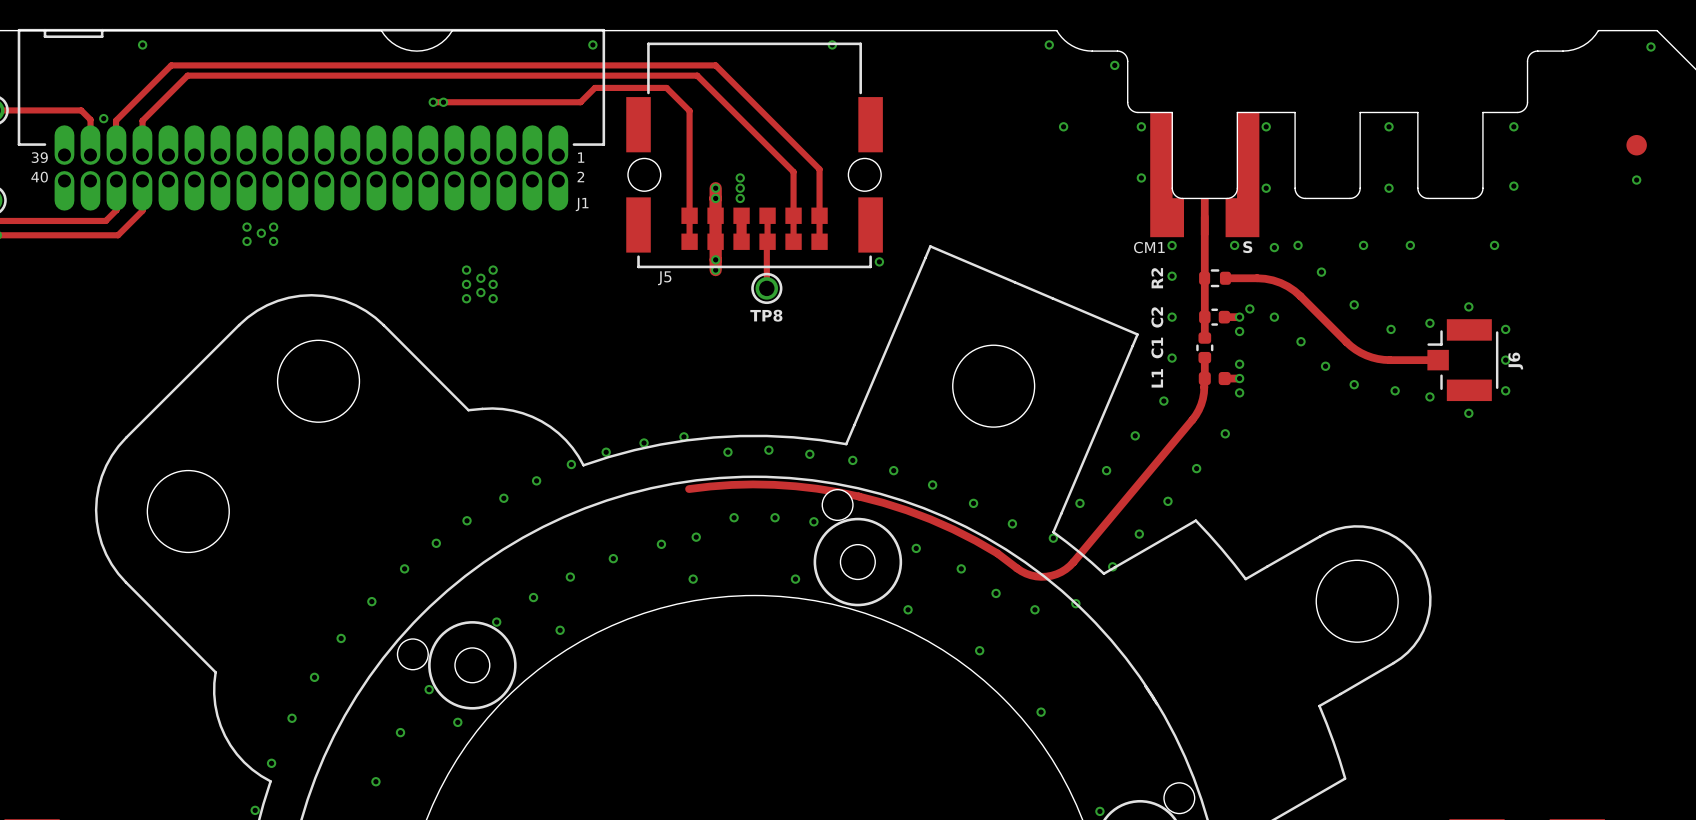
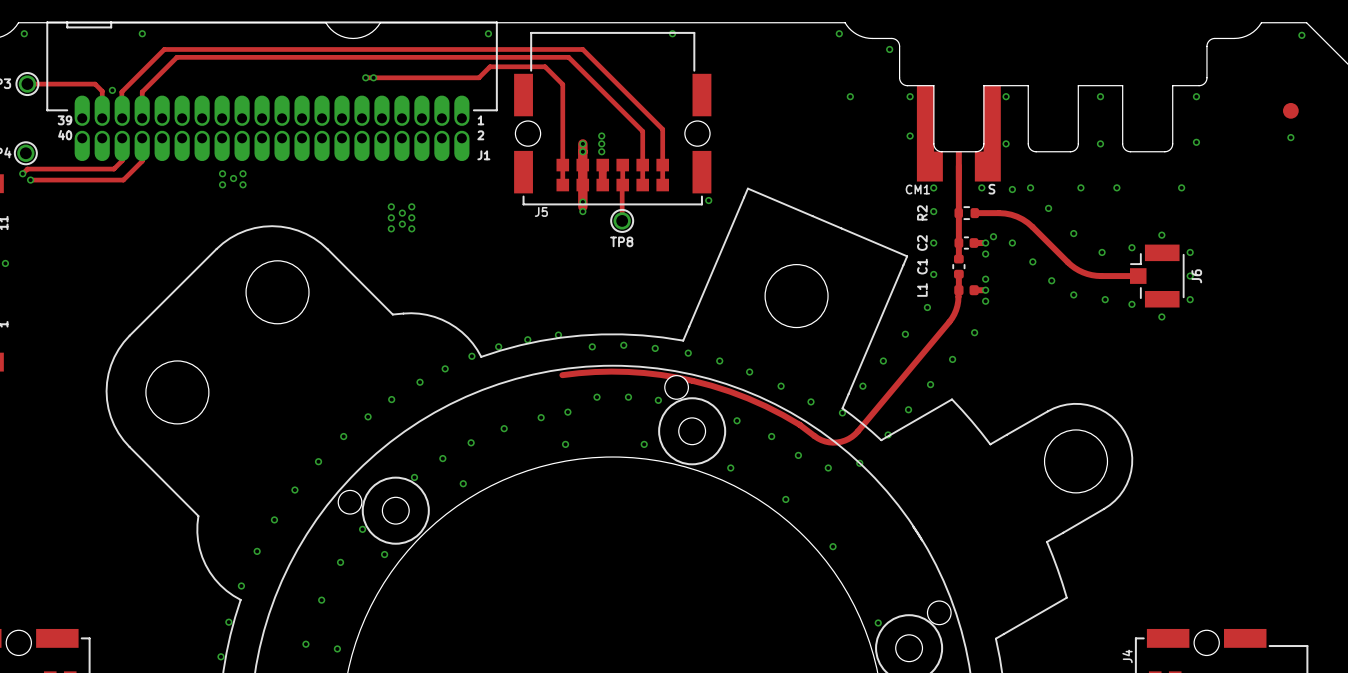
via: (715, 259) -> none
via: none -> (582, 202)
via: (715, 270) -> none
via: none -> (582, 211)

